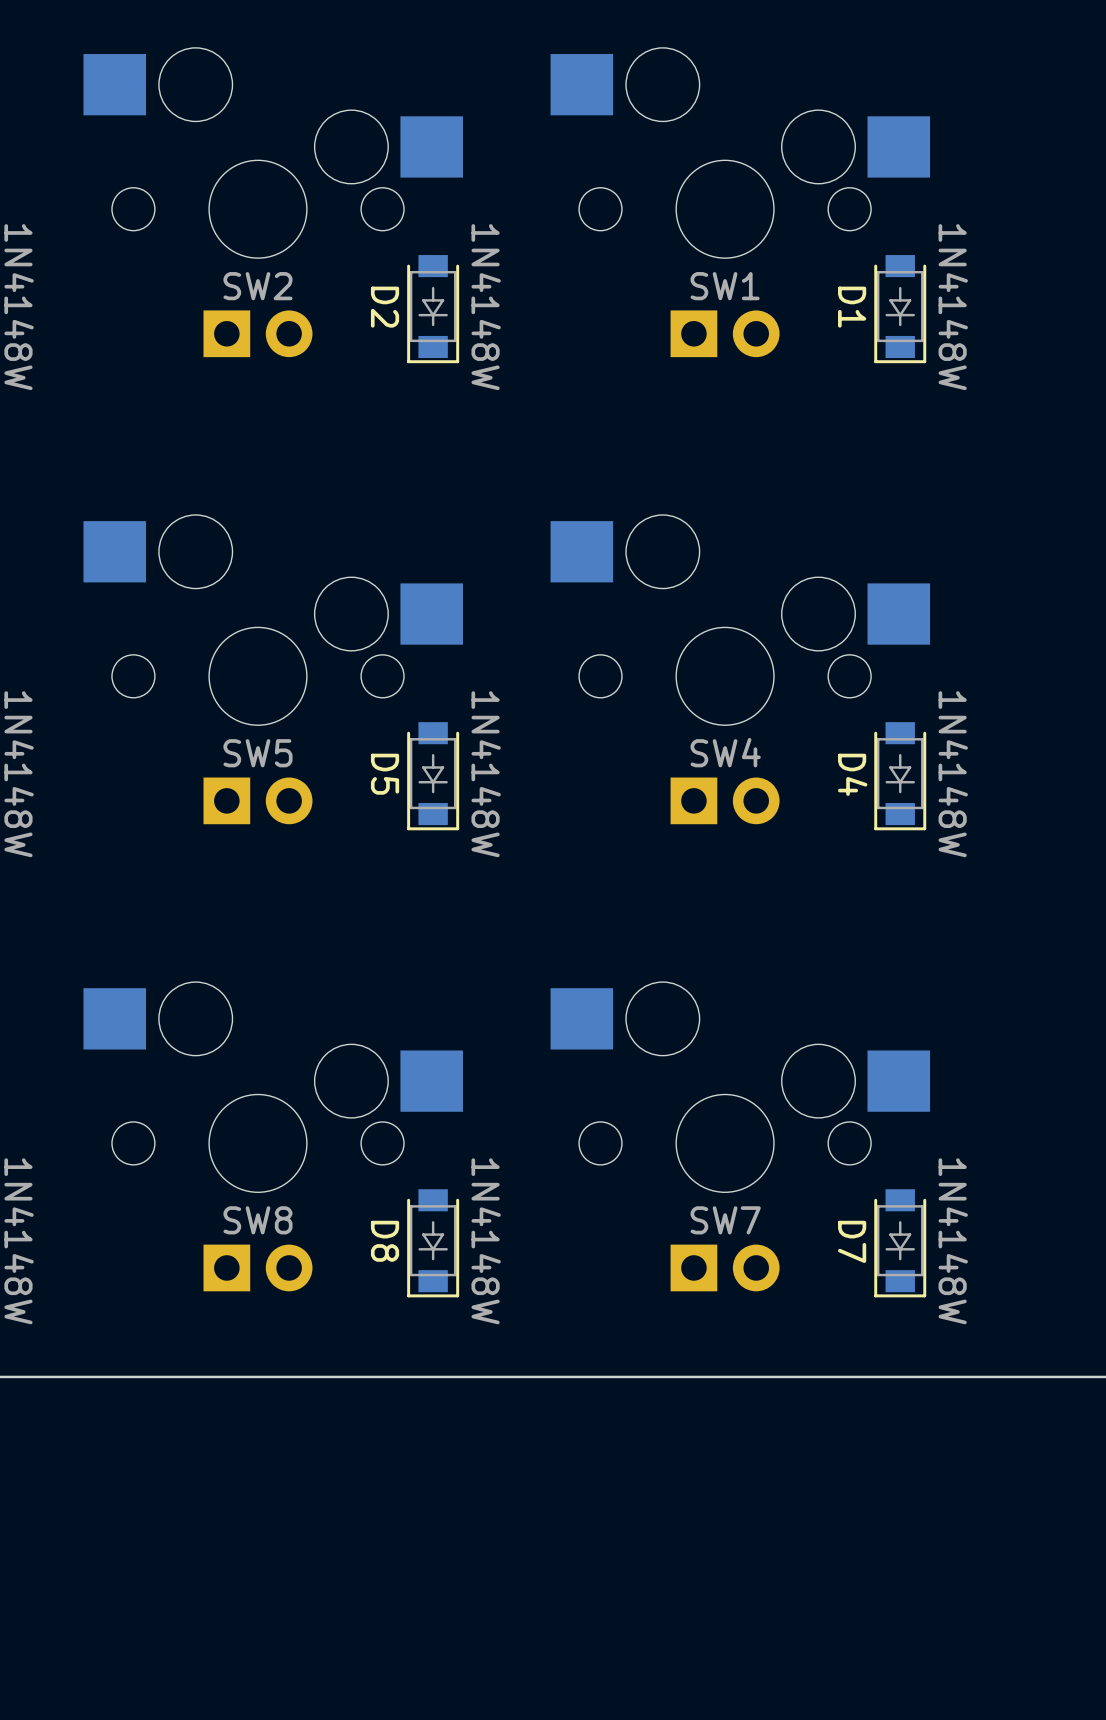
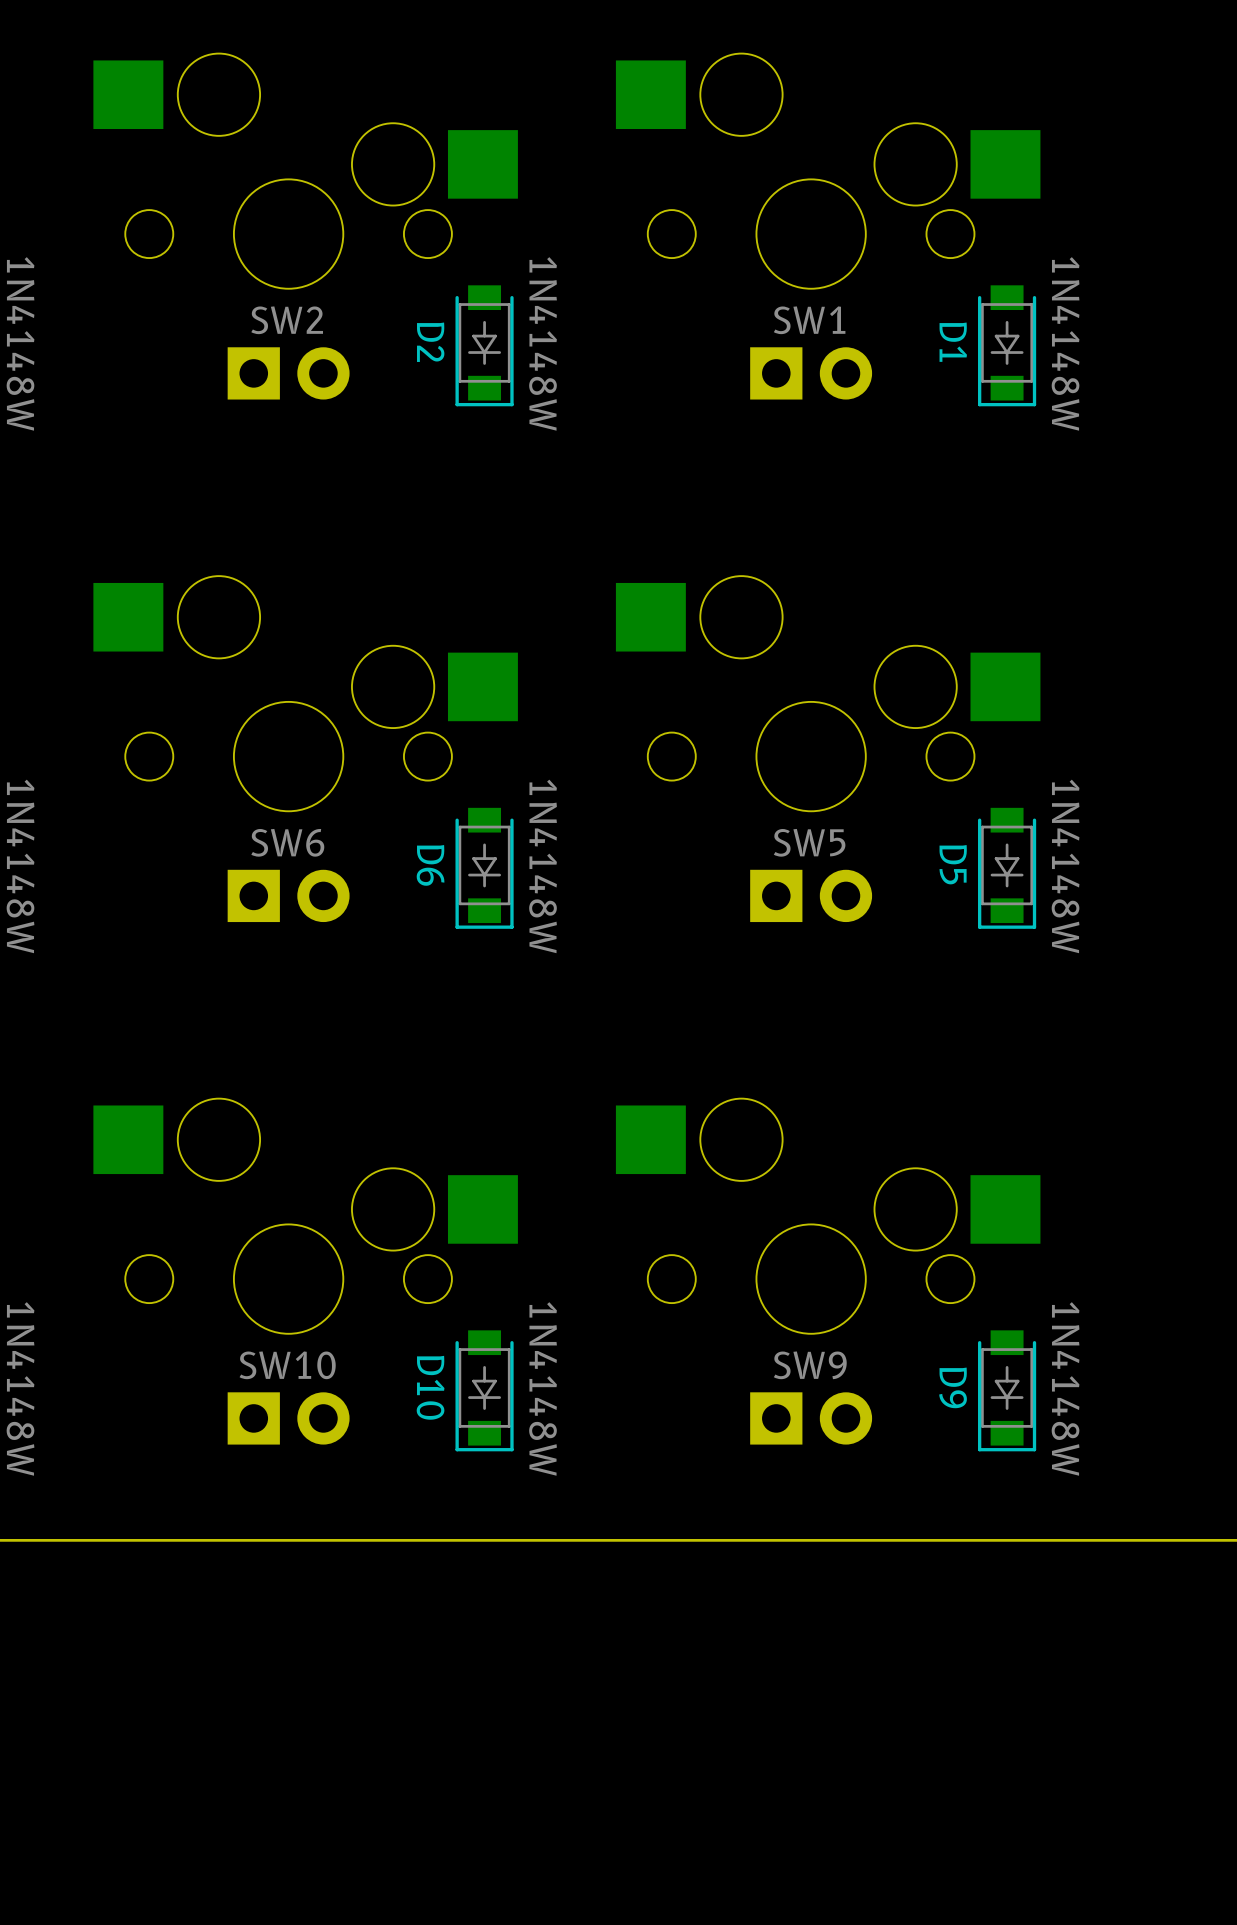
SW4 name: SW4 (725, 752) -> SW5 (809, 842)
SW5 name: SW5 (257, 753) -> SW6 (287, 842)
D5 name: D5 (385, 774) -> D6 (430, 865)
D4 name: D4 (852, 774) -> D5 (953, 864)
SW8 name: SW8 (257, 1220) -> SW10 (287, 1365)
SW7 name: SW7 (725, 1220) -> SW9 (810, 1365)
D8 name: D8 (385, 1241) -> D10 (430, 1387)
D7 name: D7 (852, 1241) -> D9 (953, 1387)

